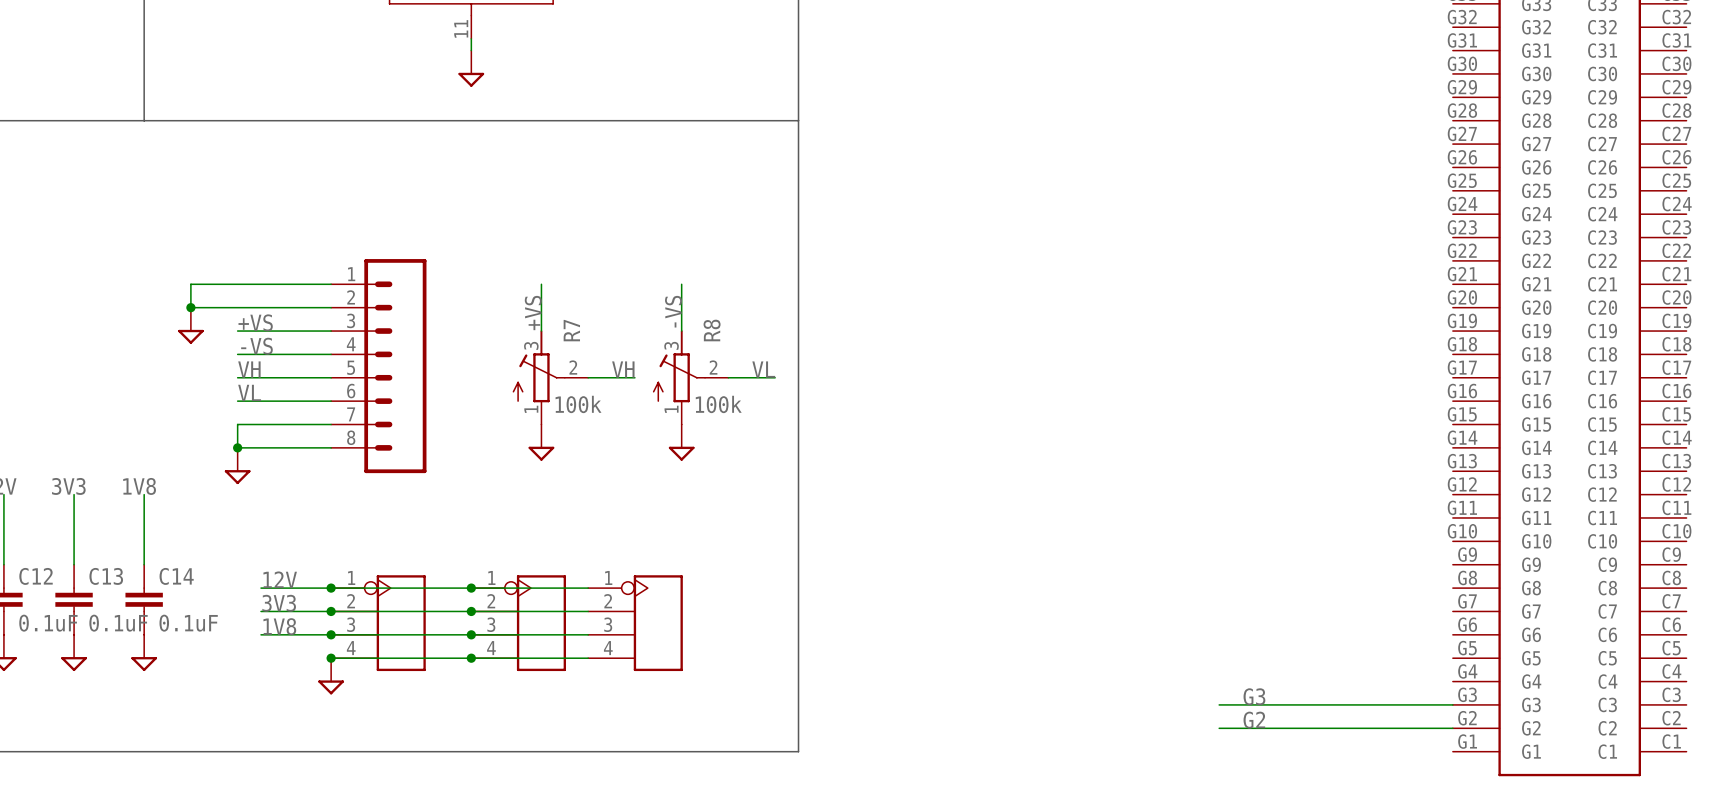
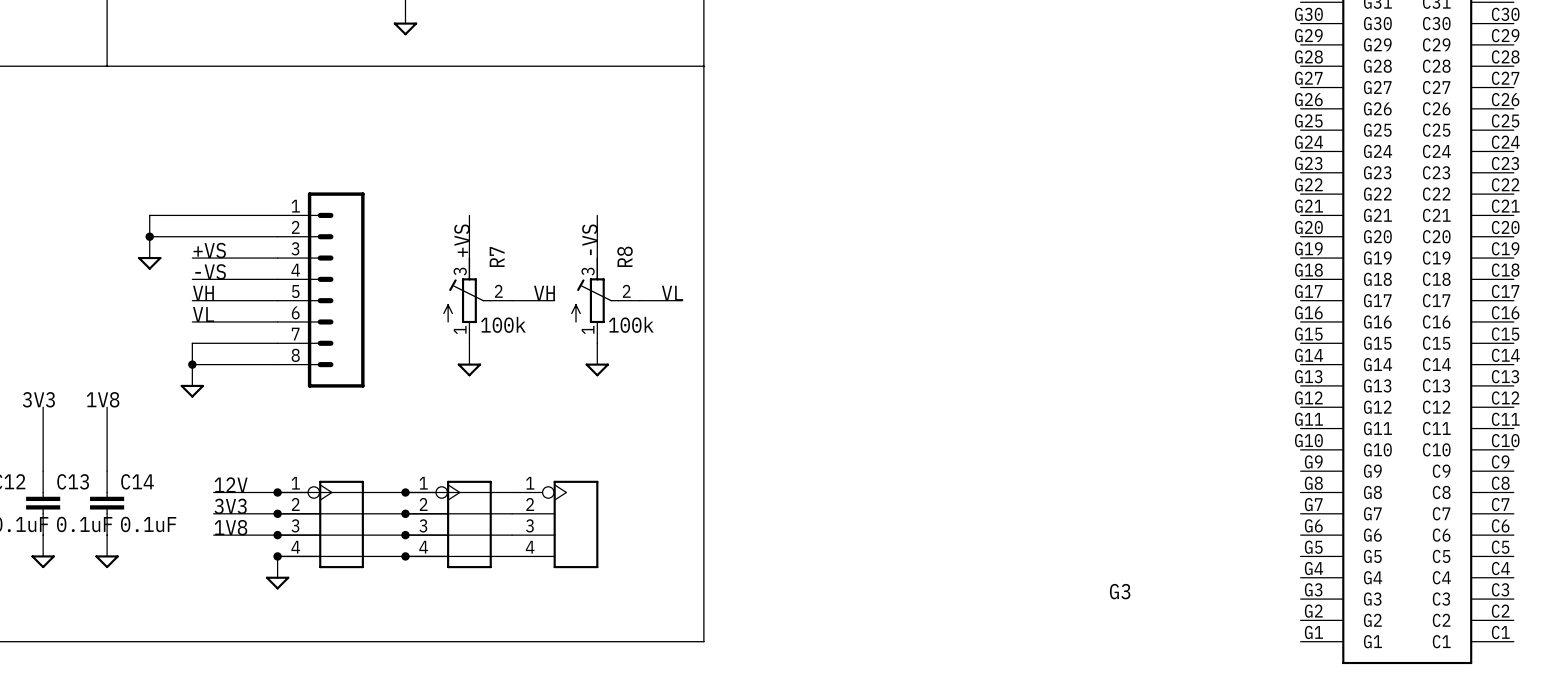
wire: (1219, 704) (1452, 704) -> none
label: G2 (1254, 720) -> none
wire: (1219, 728) (1452, 728) -> none

